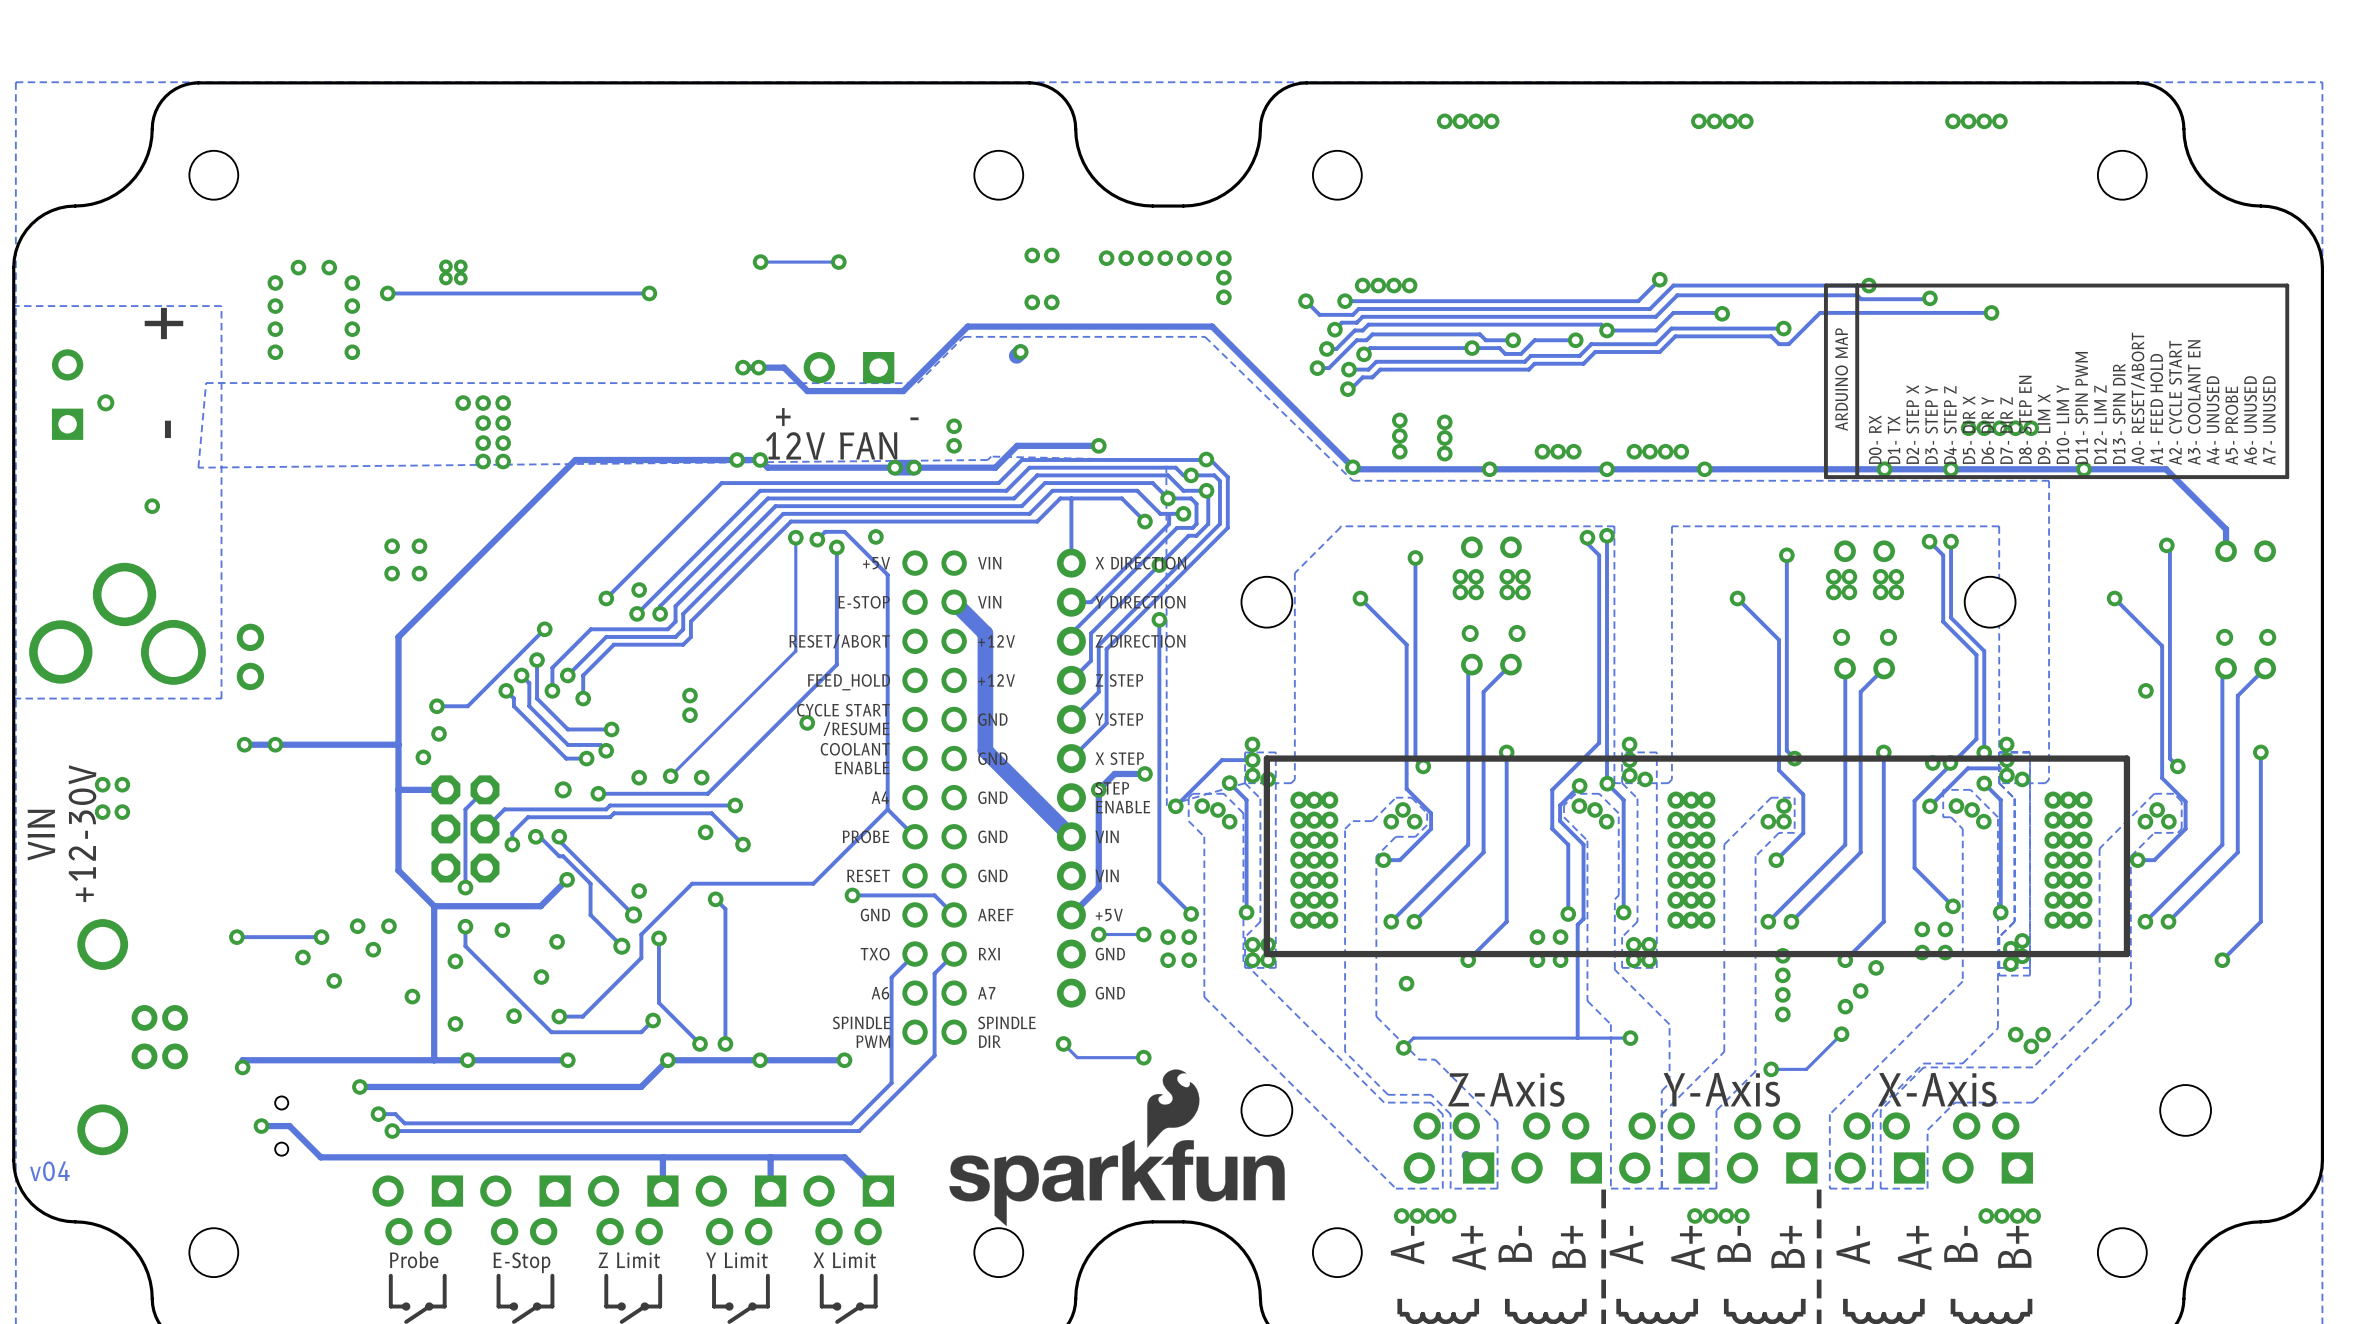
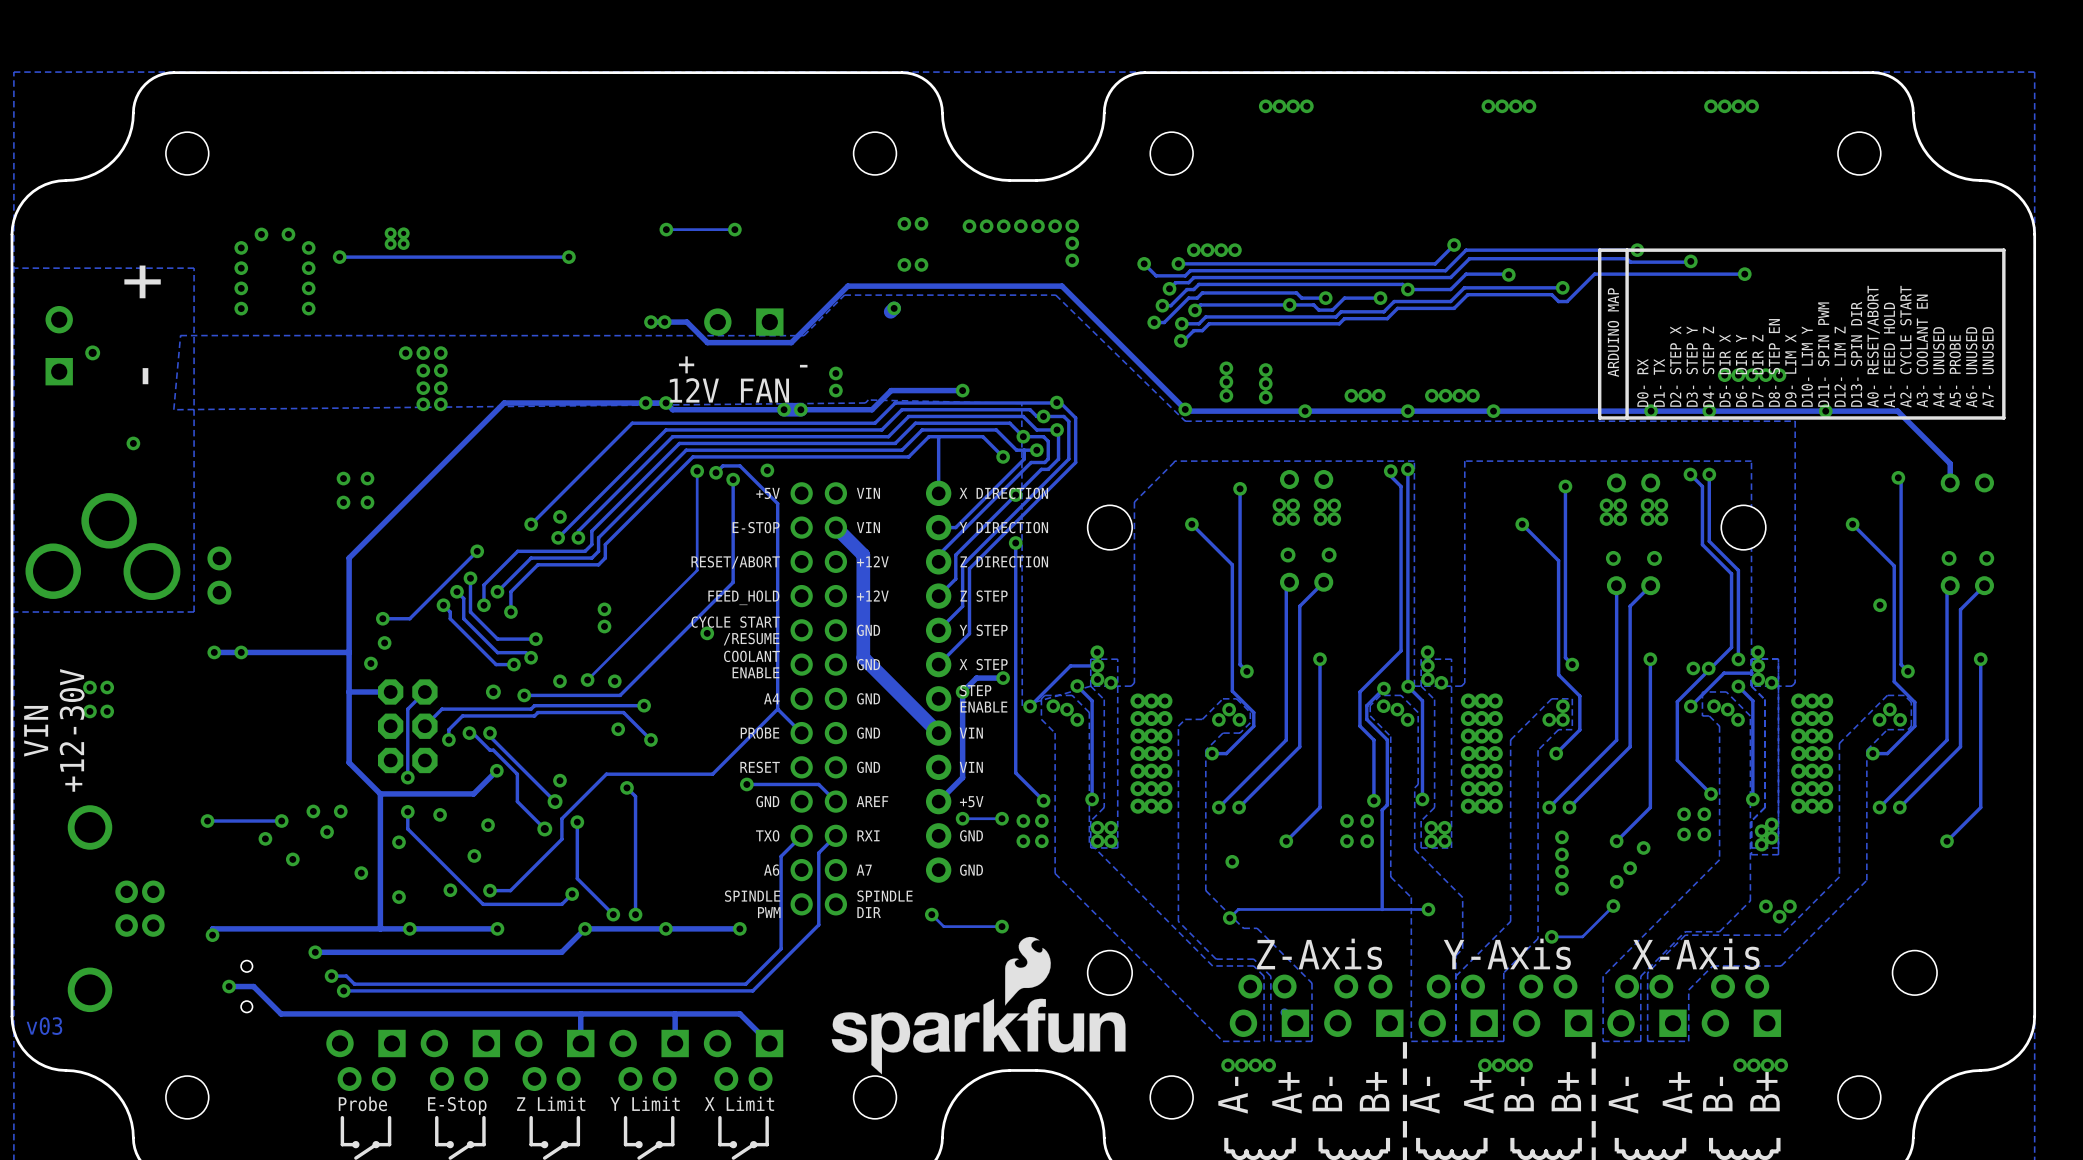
line: (2126, 758) (1266, 758) (1266, 954) (2126, 954) (2126, 758) -> none
text: v04 (49, 1171) -> v03 (44, 1026)

